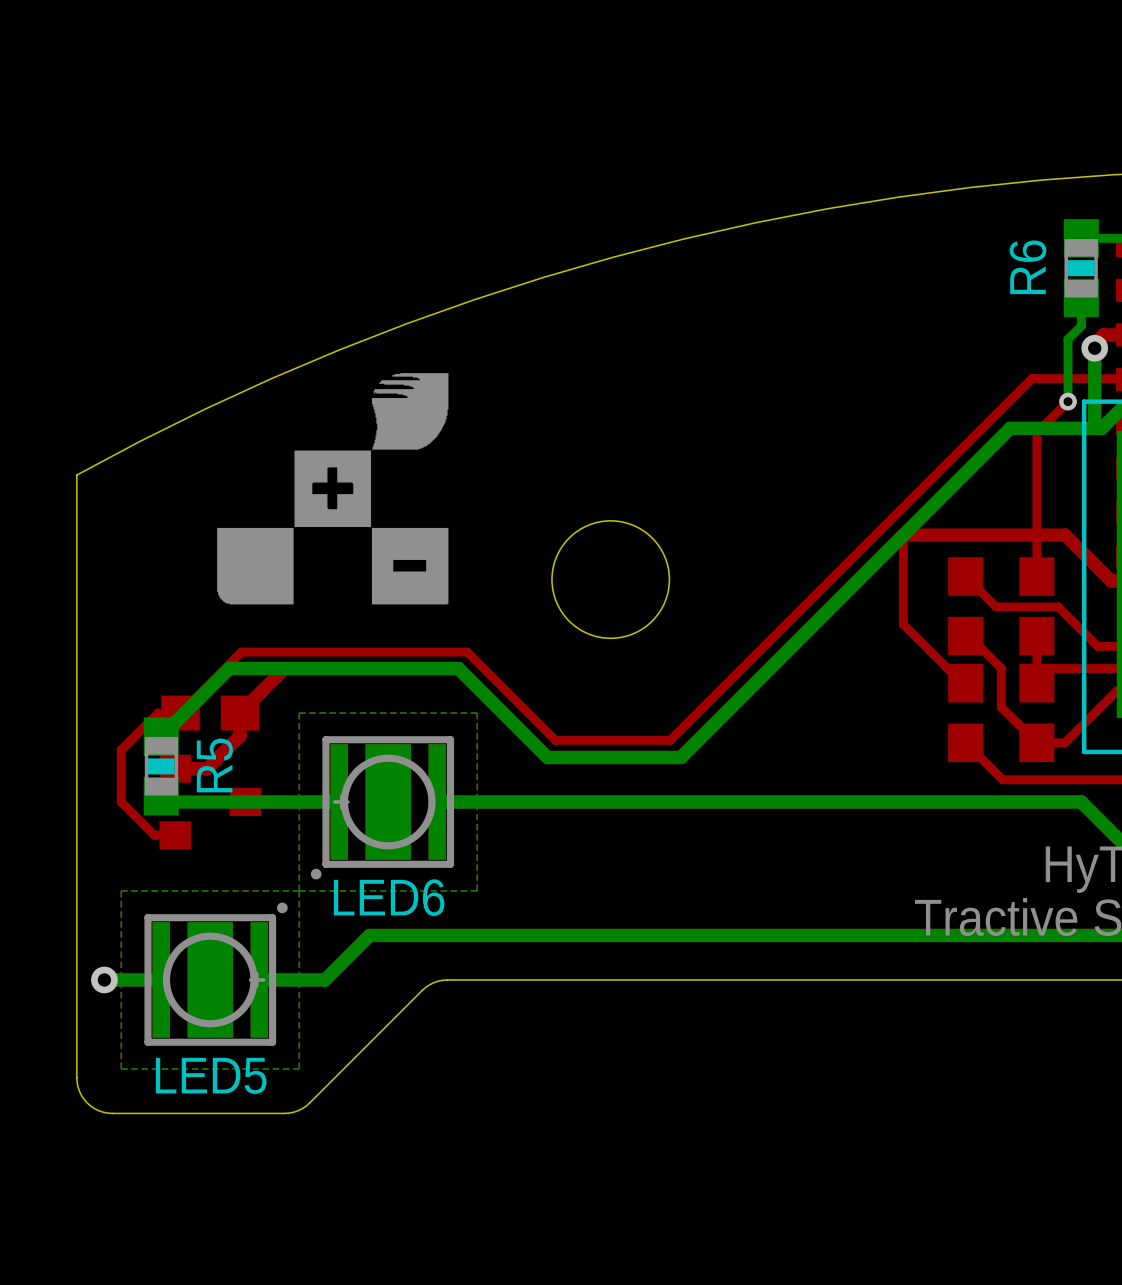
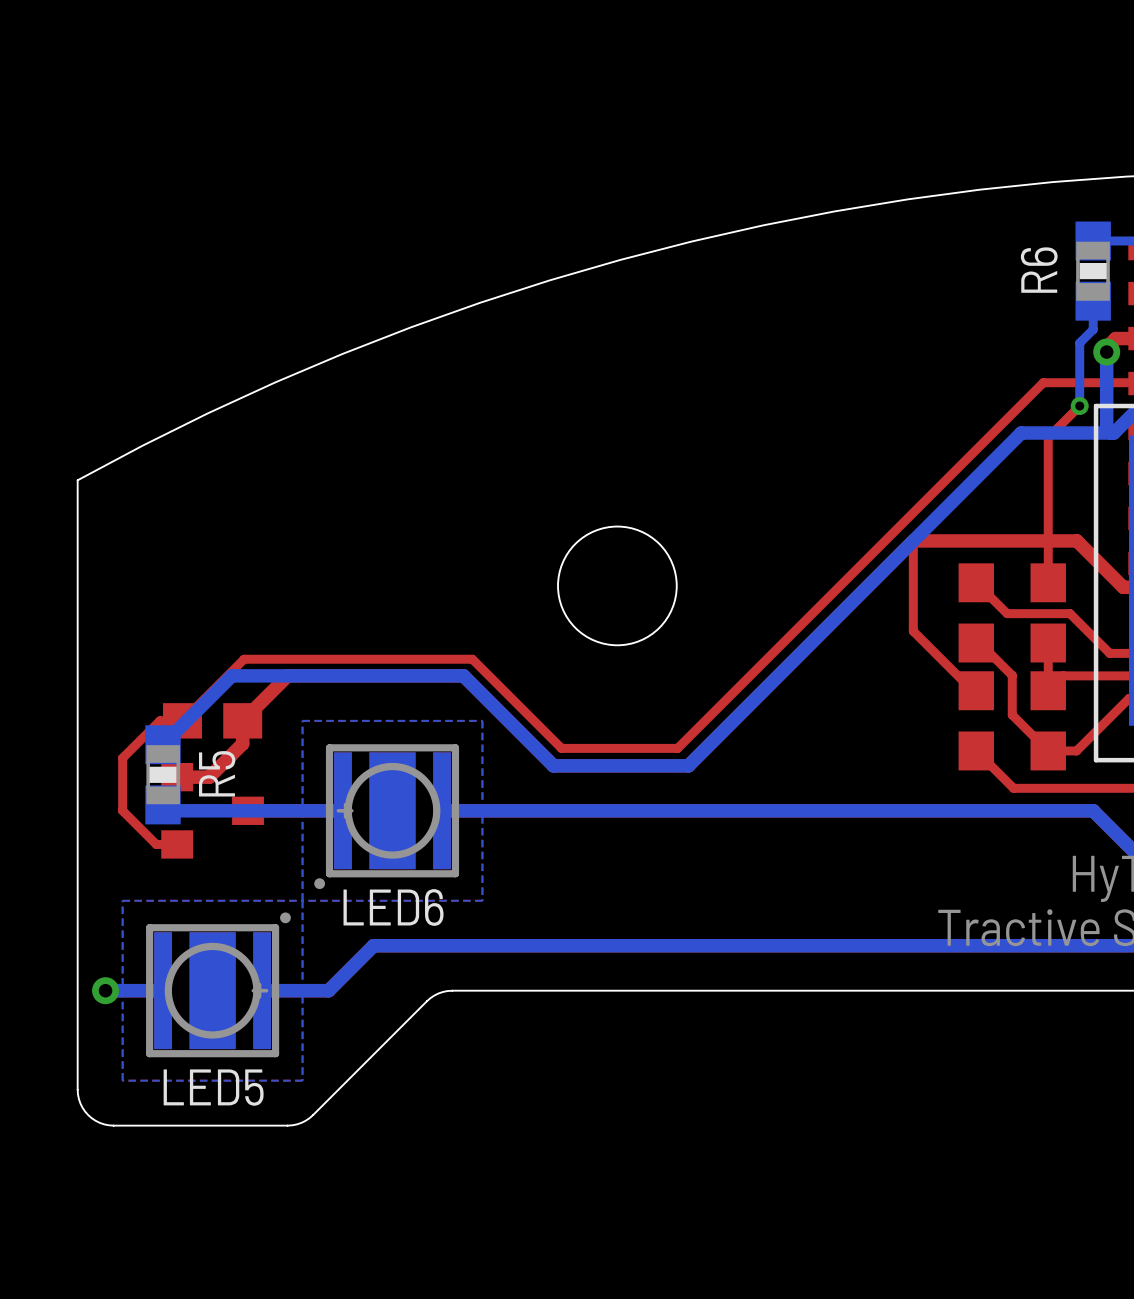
drawing: [217, 373, 449, 605] -> none

